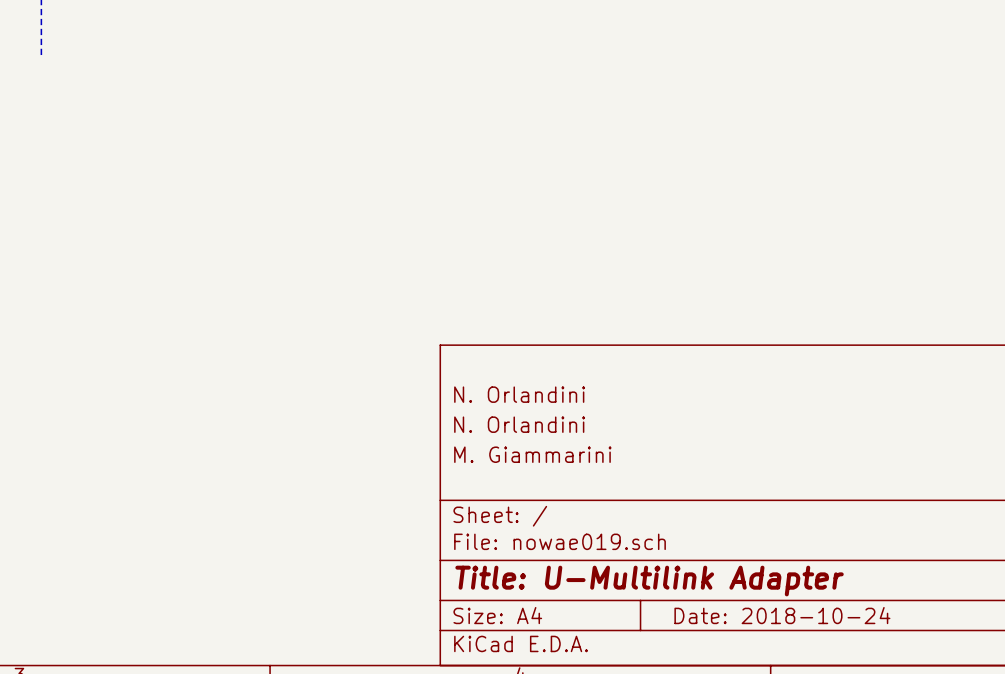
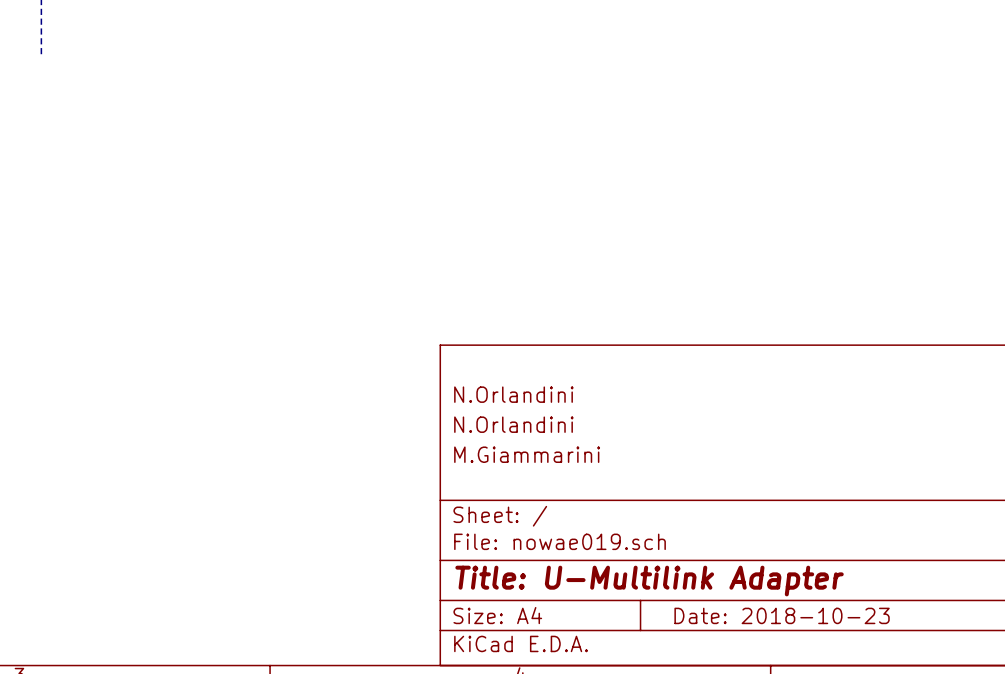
title block: N. Orlandini (519, 394) -> N.Orlandini (513, 394)
title block: N. Orlandini (519, 424) -> N.Orlandini (513, 424)
title block: M. Giammarini (532, 454) -> M.Giammarini (527, 454)
title block: Date: 2018-10-24 (782, 615) -> Date: 2018-10-23 (782, 615)

